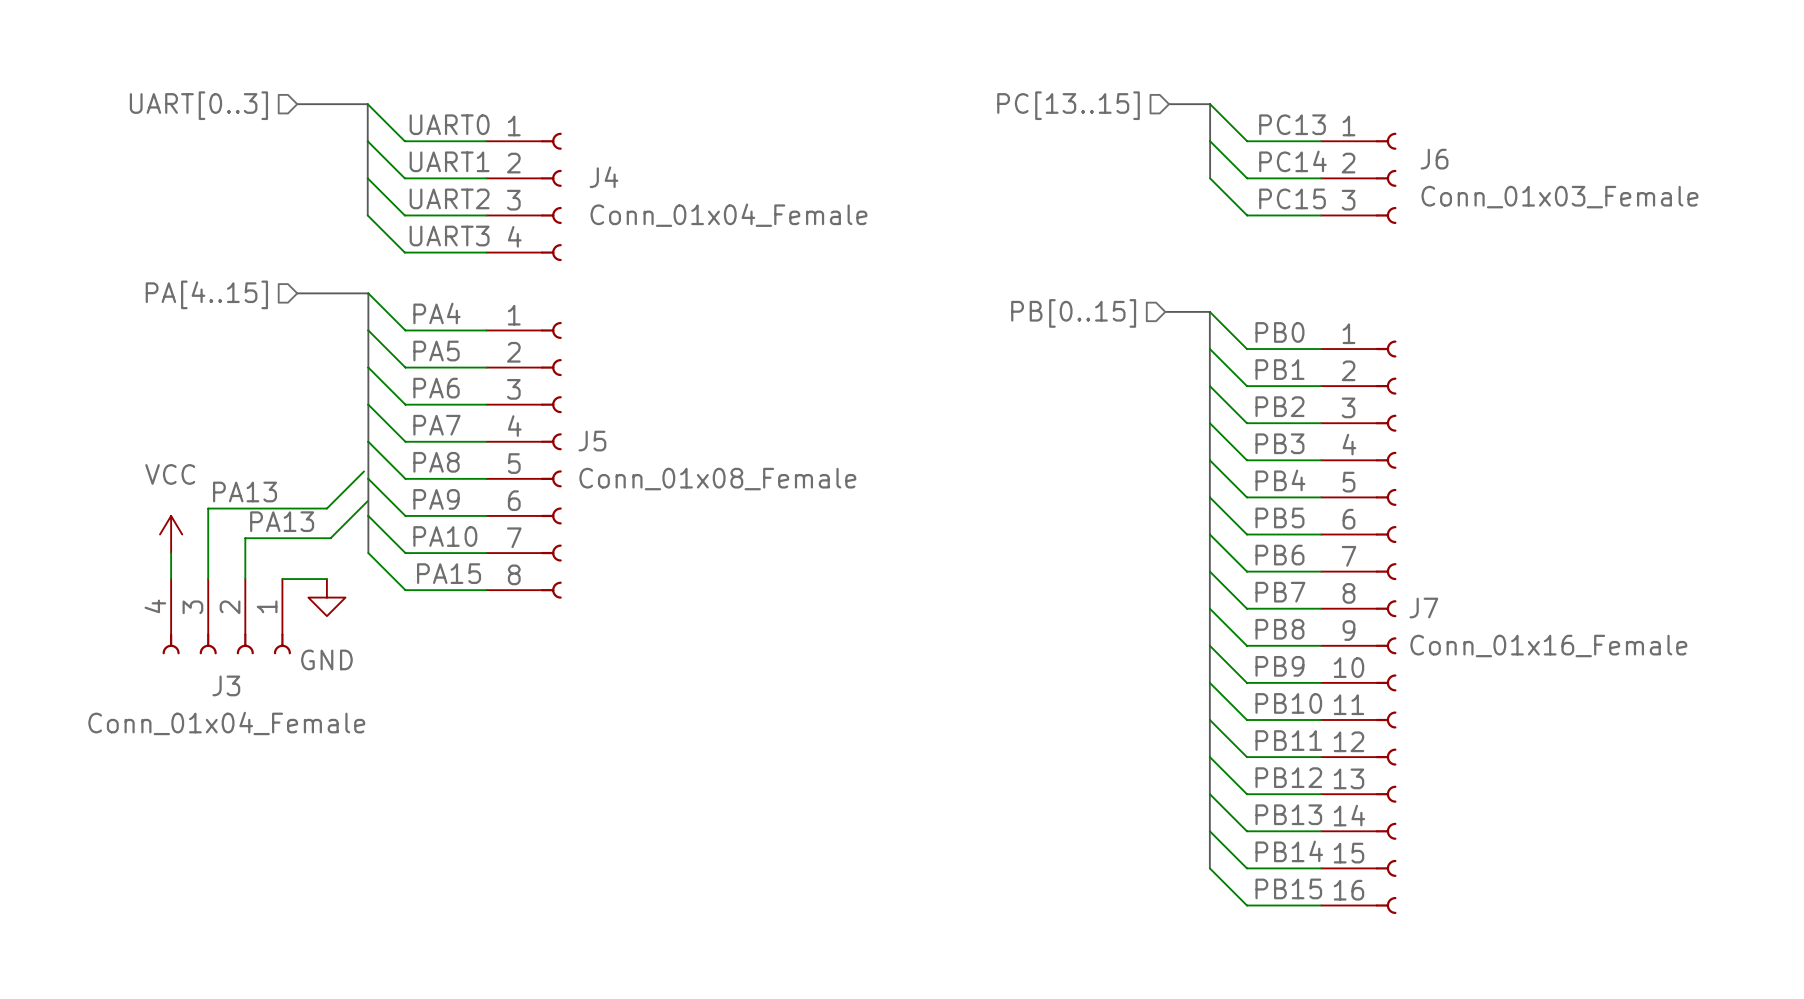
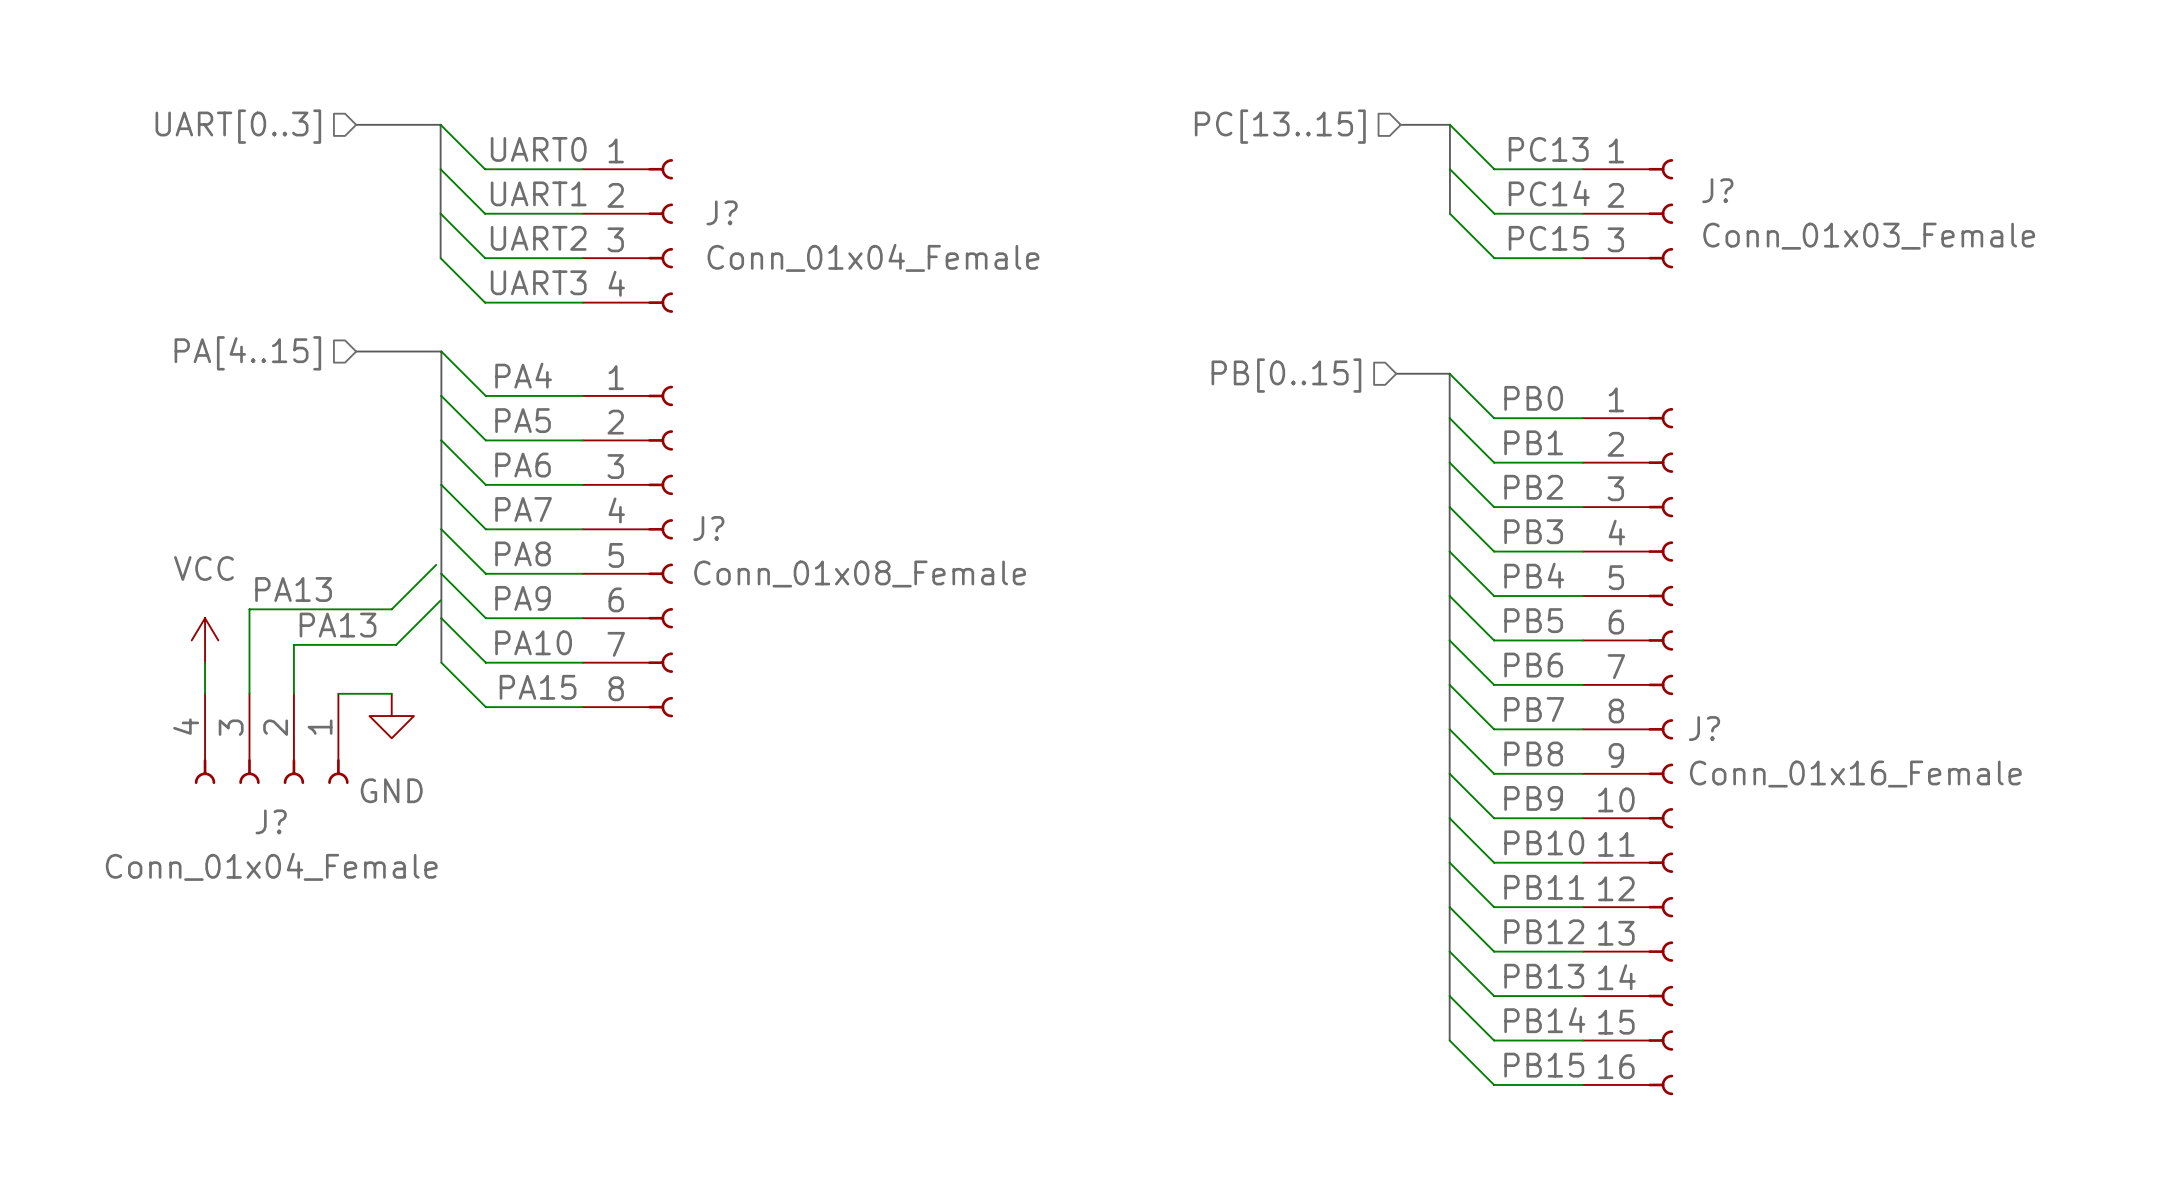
J6 name: J6 (1434, 159) -> J? (1717, 190)
J4 name: J4 (603, 177) -> J? (722, 212)
J5 name: J5 (592, 441) -> J? (708, 528)
J7 name: J7 (1423, 608) -> J? (1704, 728)
J3 name: J3 (226, 685) -> J? (271, 821)

